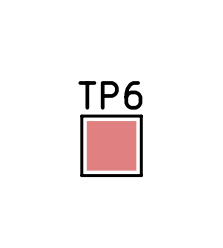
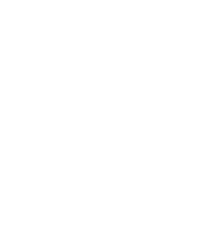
TP6: (111, 145) -> none

